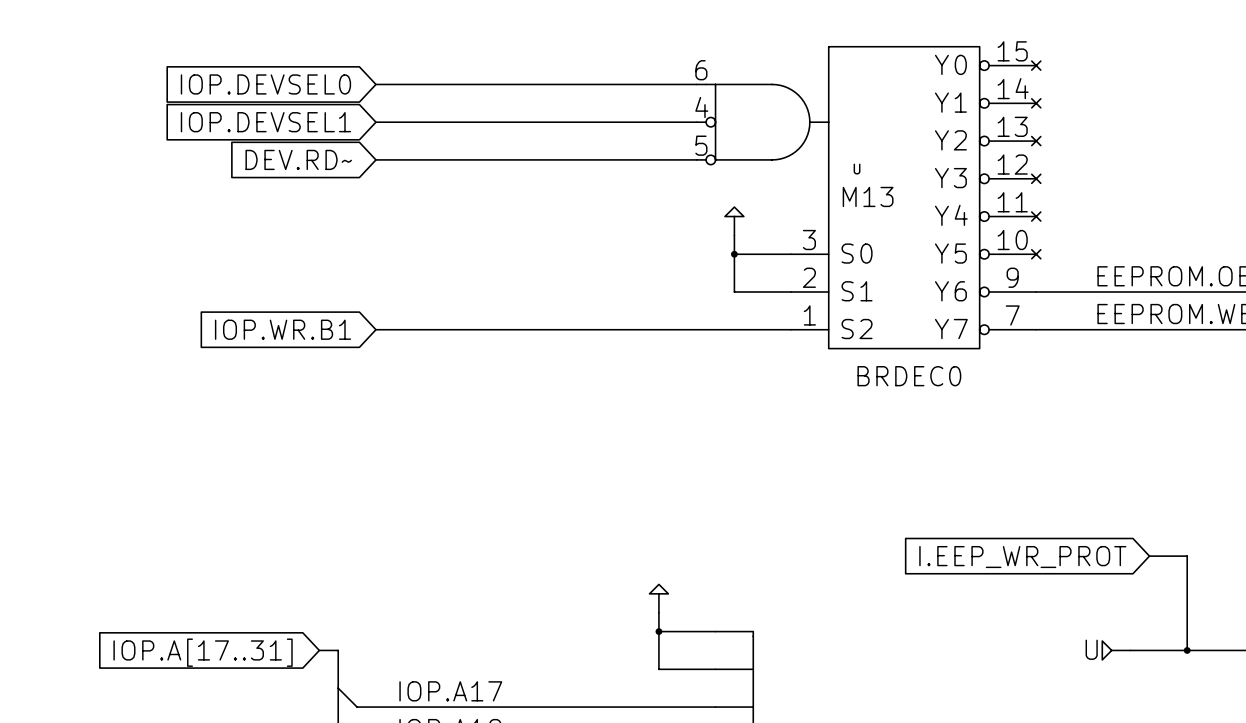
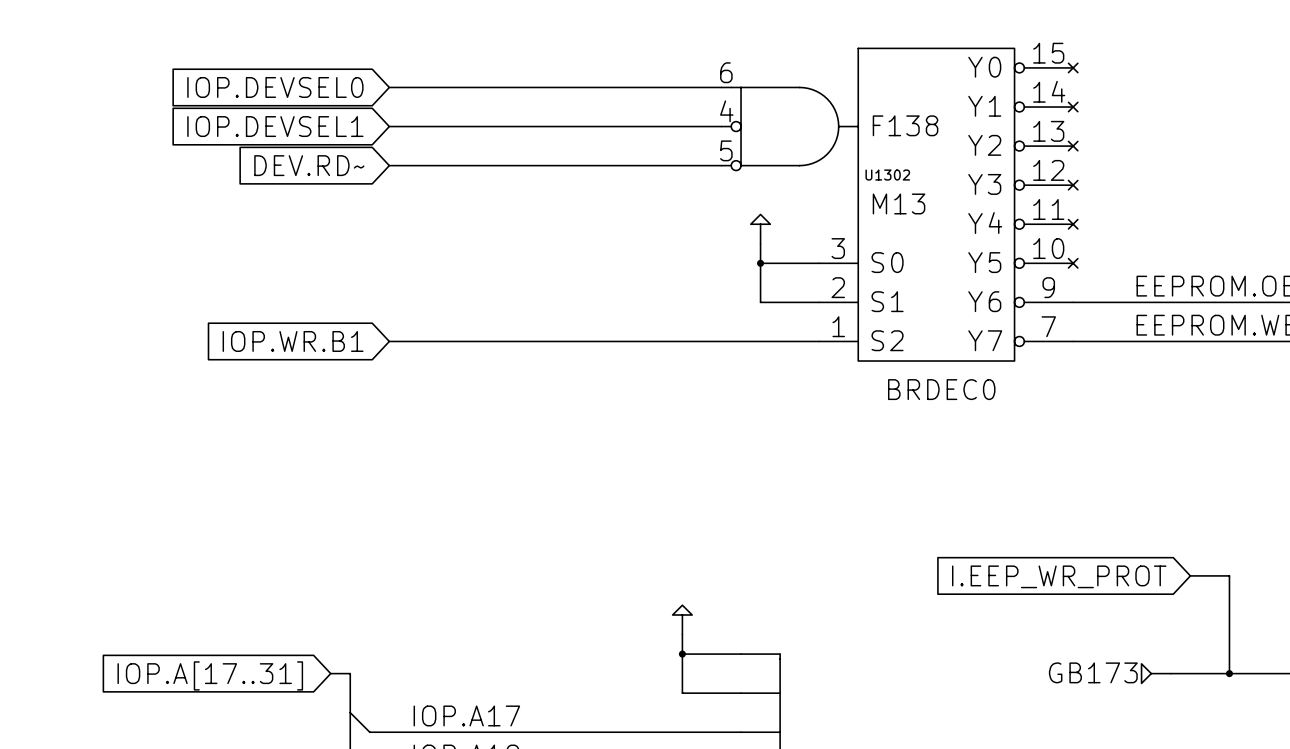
U value: none -> F138 (905, 125)
U name: U (857, 169) -> U1302 (887, 175)
U name: U (1091, 649) -> GB173 (1093, 672)

